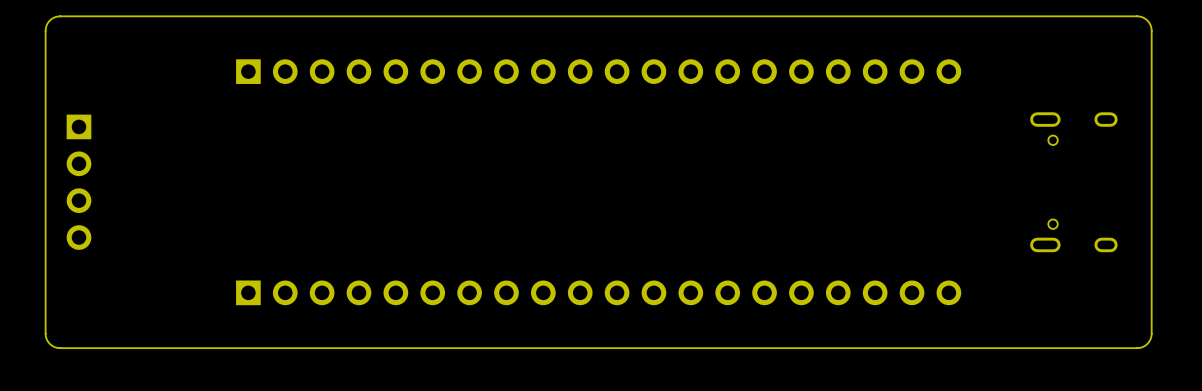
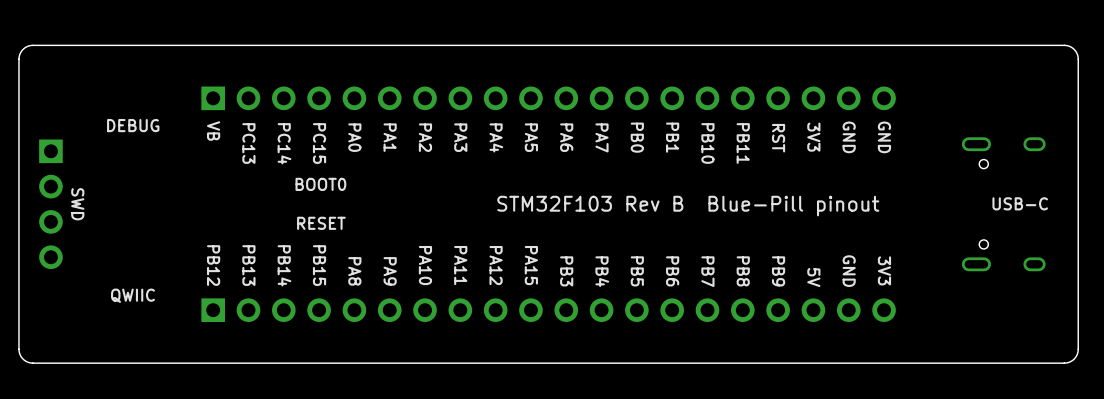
text: none -> DEBUG (133, 125)
text: none -> VB (213, 131)
text: none -> PA0 (354, 137)
text: none -> PA1 (390, 137)
text: none -> PA2 (425, 137)
text: none -> PA3 (460, 137)
text: none -> PA4 (496, 137)
text: none -> PA5 (531, 137)
text: none -> PA6 (566, 137)
text: none -> PA7 (601, 137)
text: none -> PB0 (637, 137)
text: none -> PB1 (672, 137)
text: none -> 3V3 (813, 137)
text: none -> GND (849, 137)
text: none -> GND (884, 137)
text: none -> RST (778, 138)
text: none -> PC13 (248, 143)
text: none -> PC15 (319, 143)
text: none -> PB10 (707, 143)
text: none -> PB11 (743, 143)
text: none -> PC14 (284, 143)
text: none -> BOOT0 (320, 184)
text: none -> USB-C (1020, 203)
text: none -> SWD (77, 204)
text: none -> STM32F103 Rev B Blue-Pill pinout (688, 206)
text: none -> RESET (321, 223)
text: none -> PB12 (213, 265)
text: none -> PB13 (248, 265)
text: none -> PB14 (284, 265)
text: none -> PB15 (319, 265)
text: none -> PA10 (425, 265)
text: none -> PA11 (460, 265)
text: none -> PA12 (496, 265)
text: none -> PA15 (531, 265)
text: none -> 3V3 (884, 270)
text: none -> PA8 (354, 271)
text: none -> PA9 (390, 271)
text: none -> PB3 (566, 271)
text: none -> PB4 (602, 271)
text: none -> PB5 (637, 271)
text: none -> PB6 (672, 271)
text: none -> PB7 (707, 271)
text: none -> PB8 (743, 271)
text: none -> PB9 (778, 271)
text: none -> GND (849, 271)
text: none -> 5V (813, 277)
text: none -> QWIIC (132, 295)

